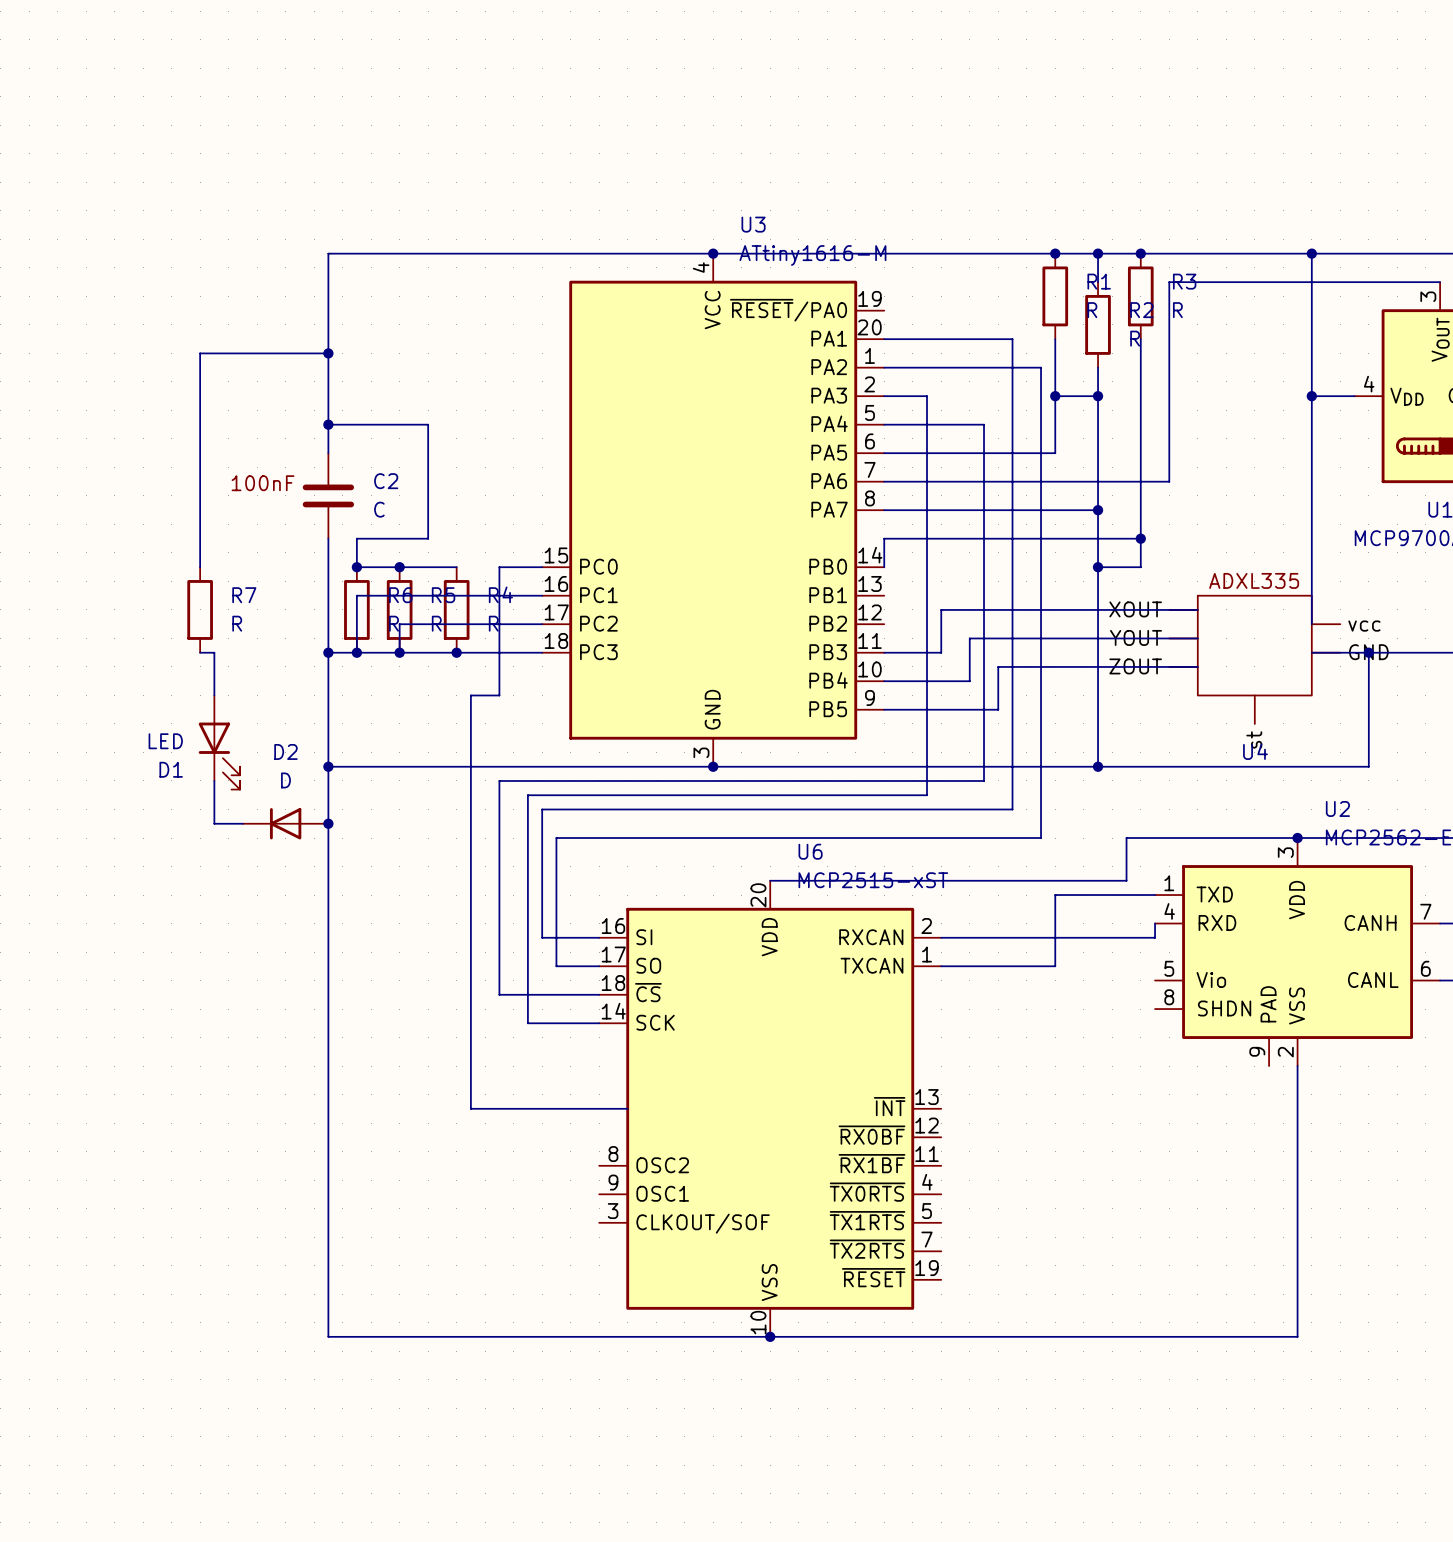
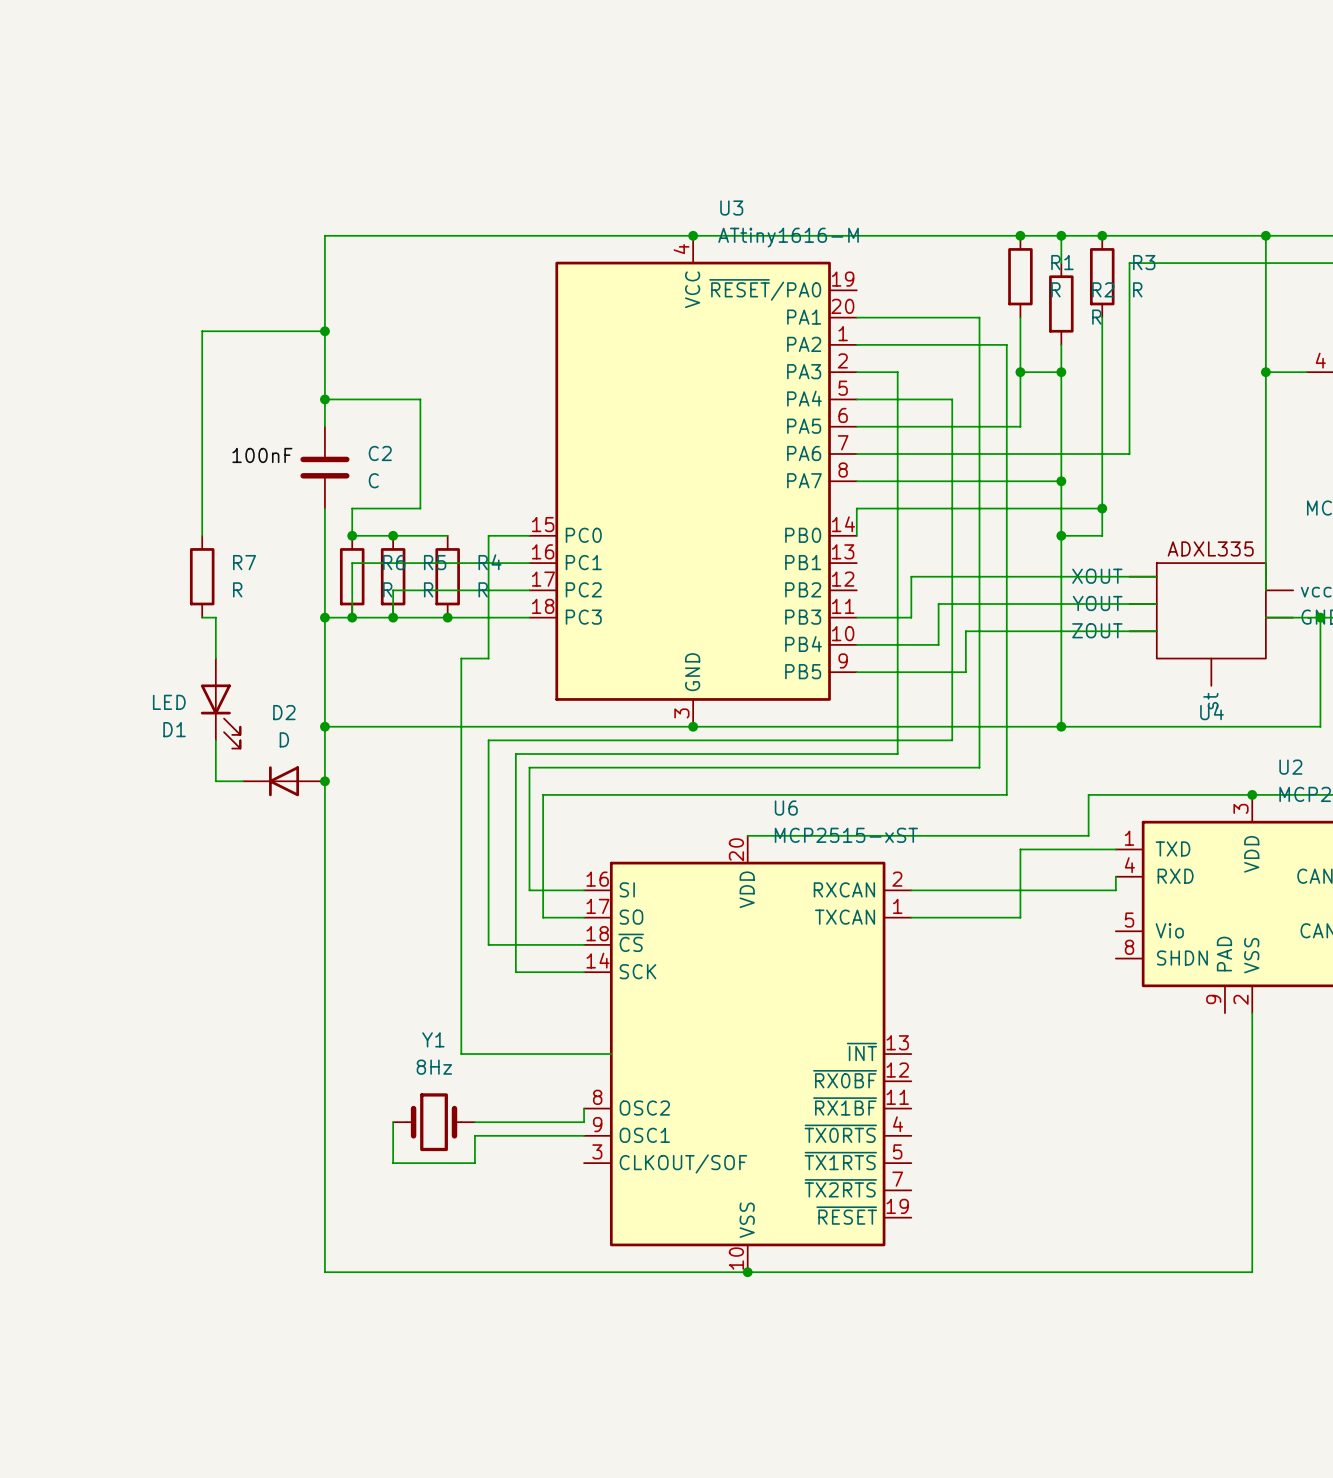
wire: none -> (584, 1108) (584, 1122) (474, 1122)
wire: none -> (393, 1122) (393, 1163) (474, 1163) (474, 1135) (584, 1135)
Y1: none -> 8Hz (434, 1122)

